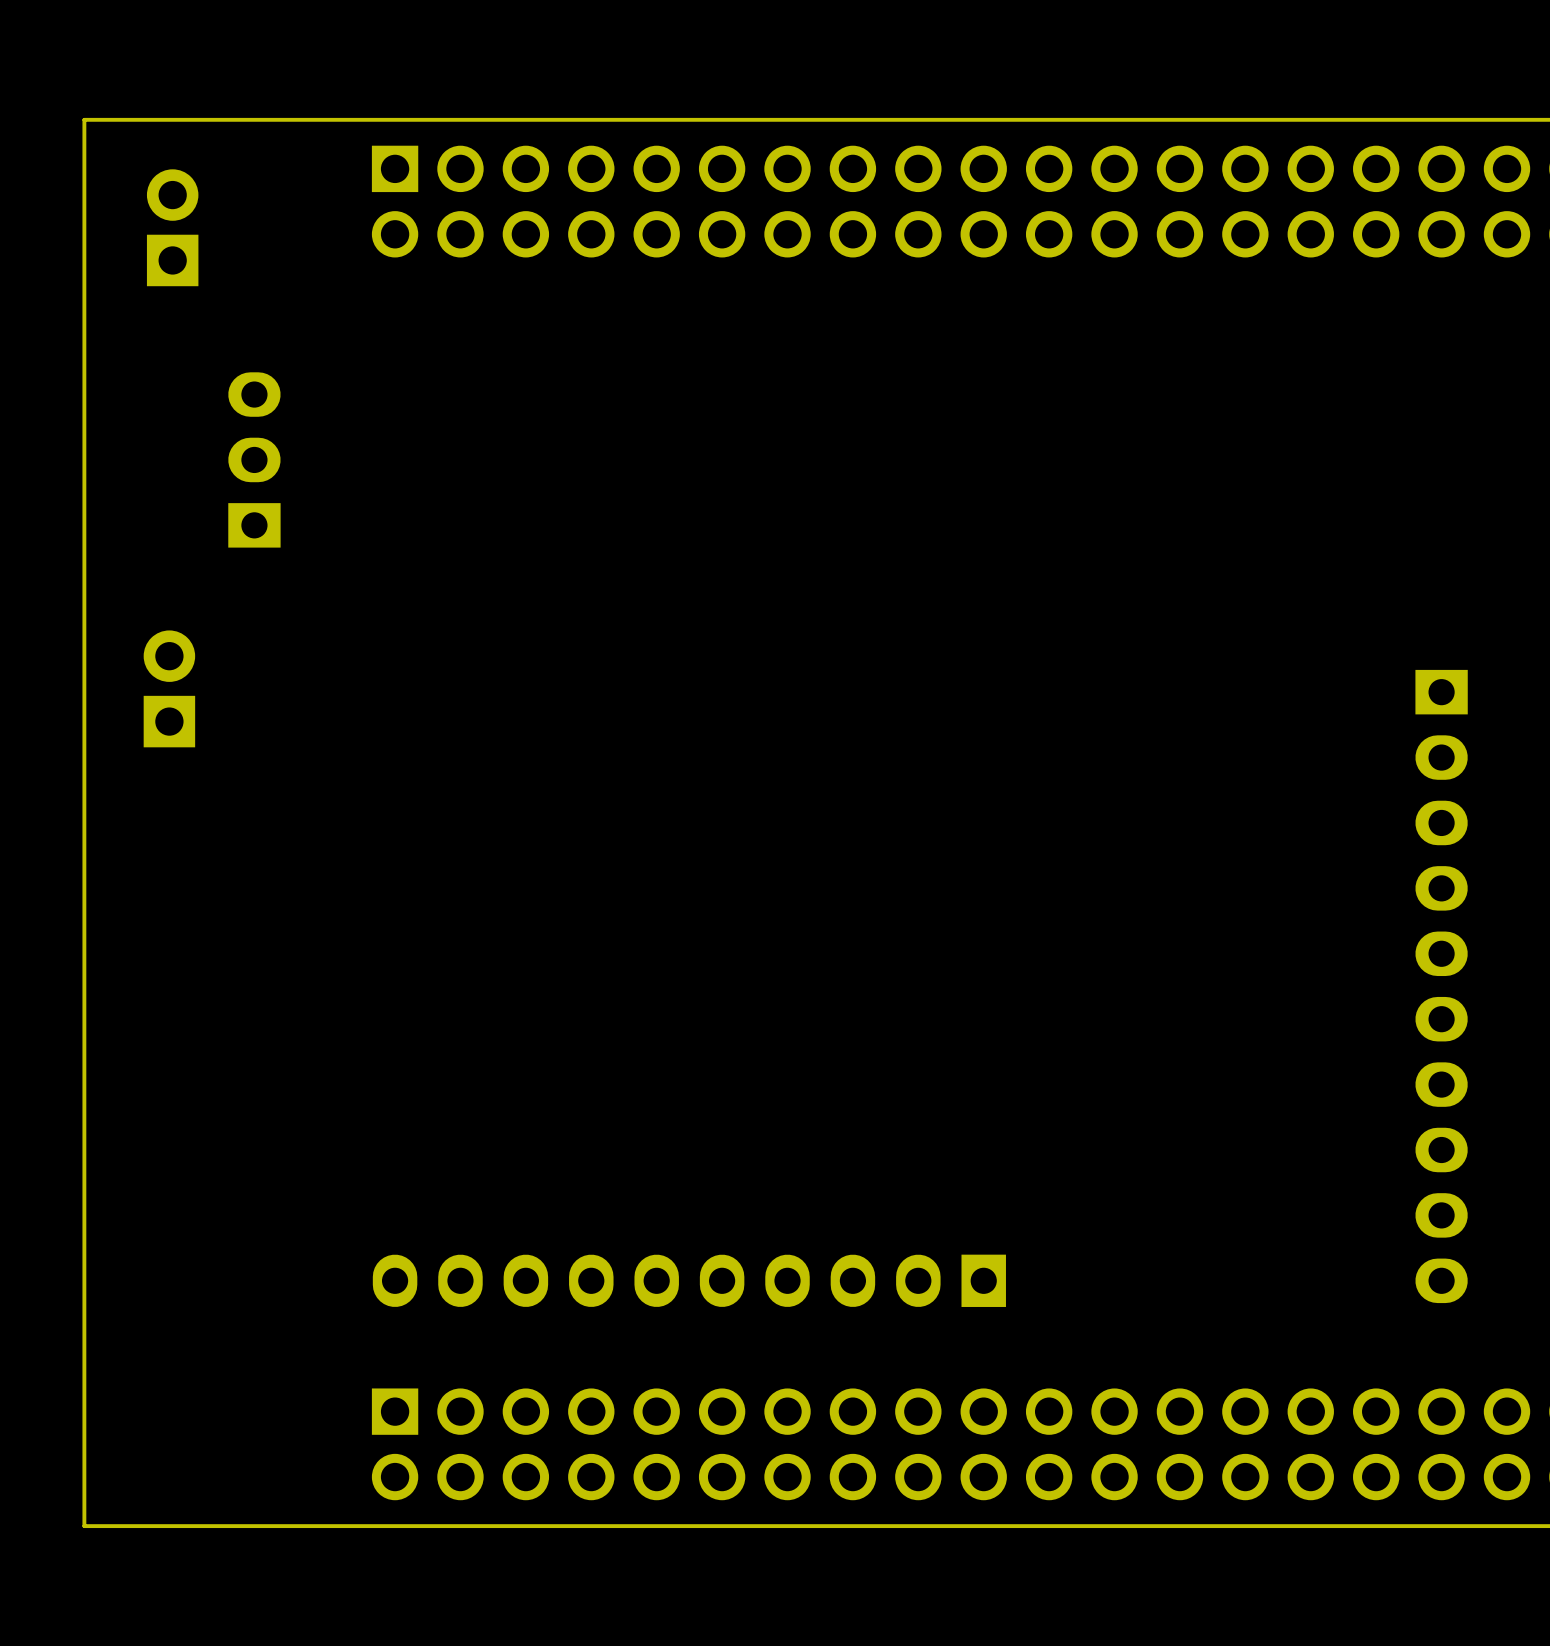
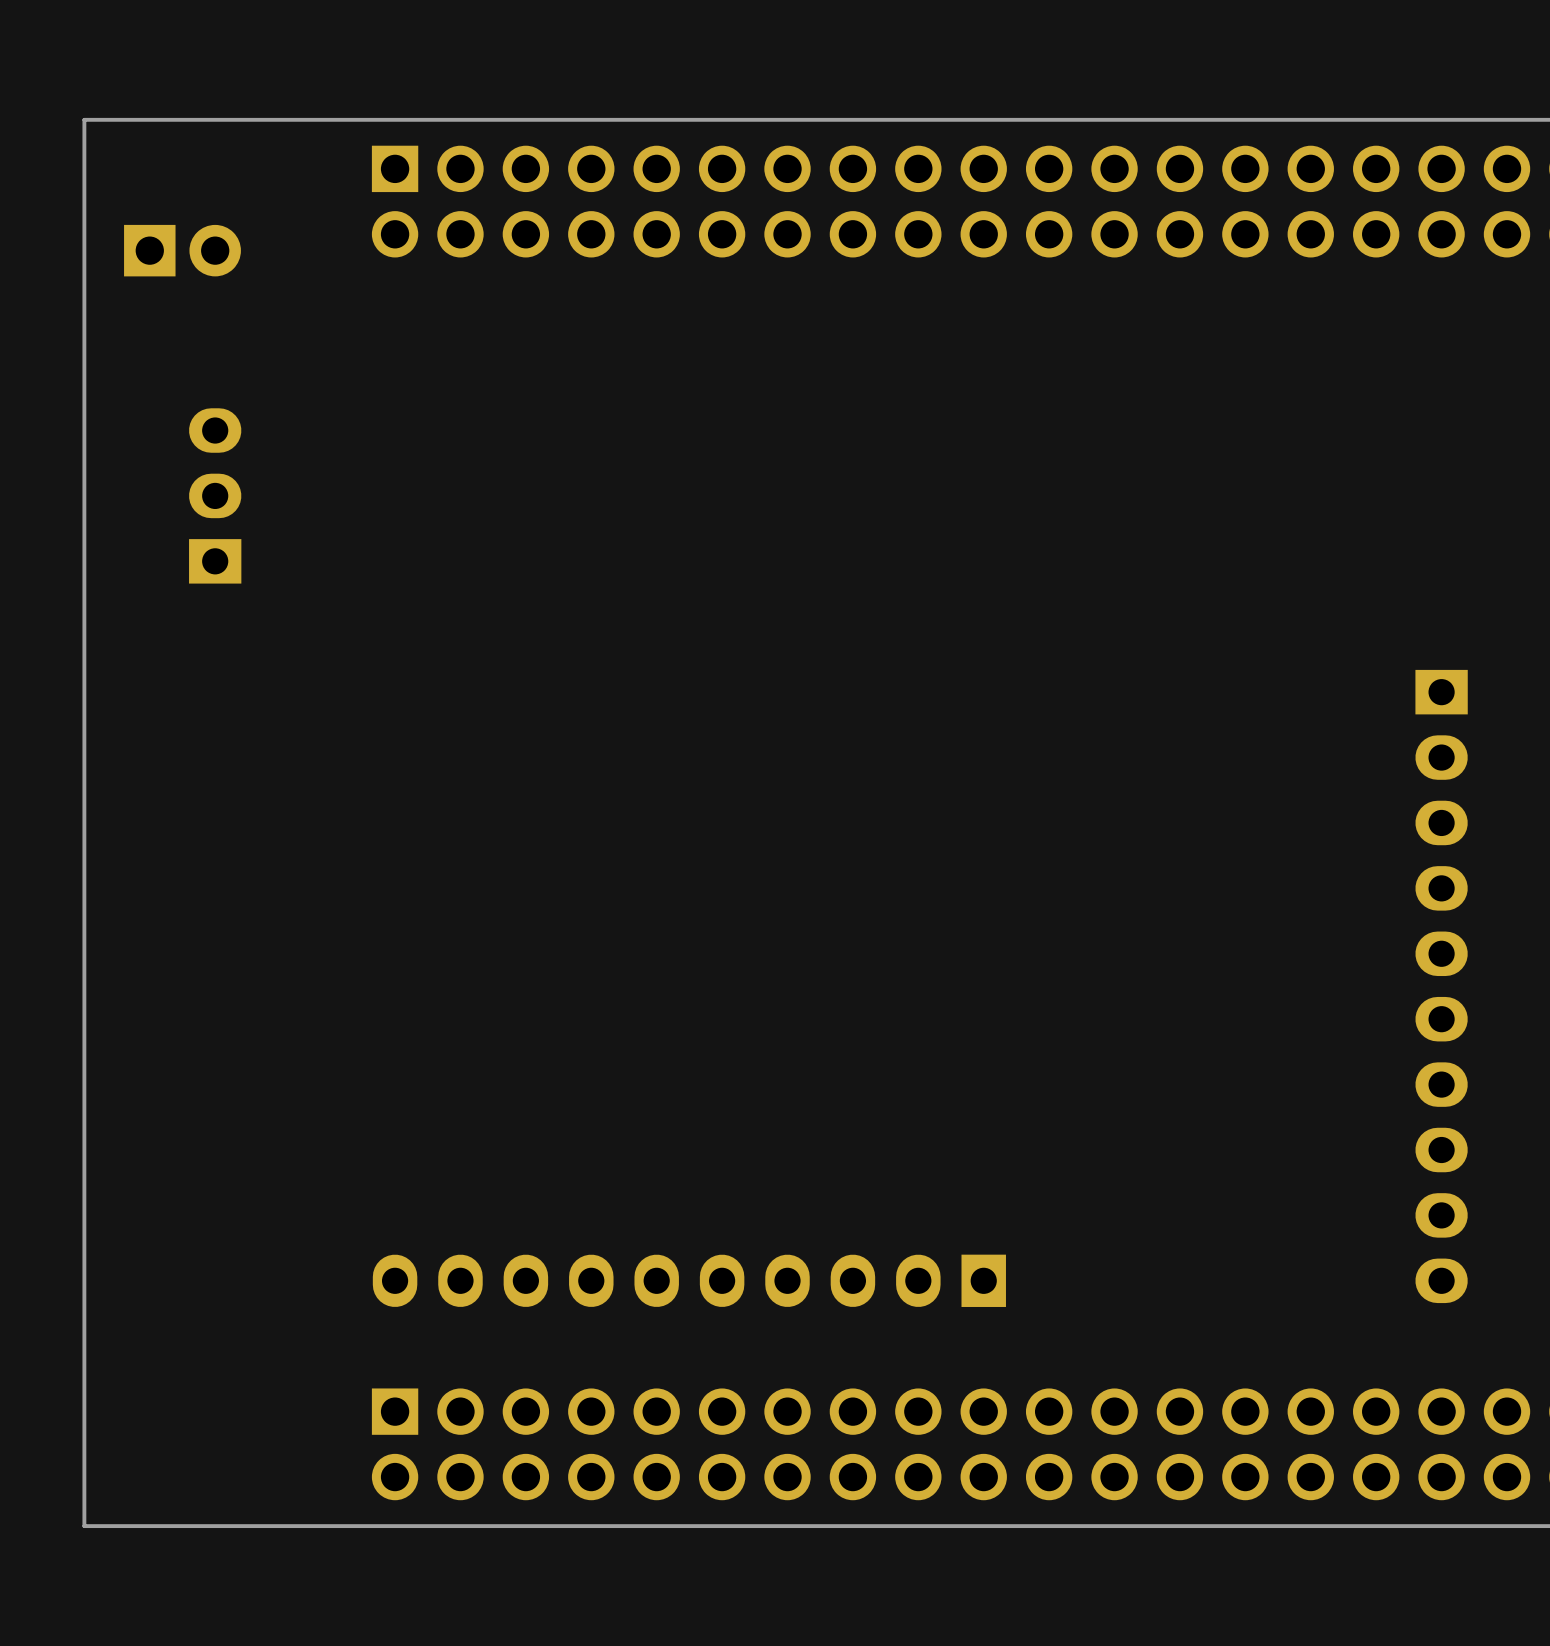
part rotation: 0° (172, 227) -> 90° clockwise (182, 250)
part position: (254, 459) -> (215, 495)
part: (169, 688) -> none

